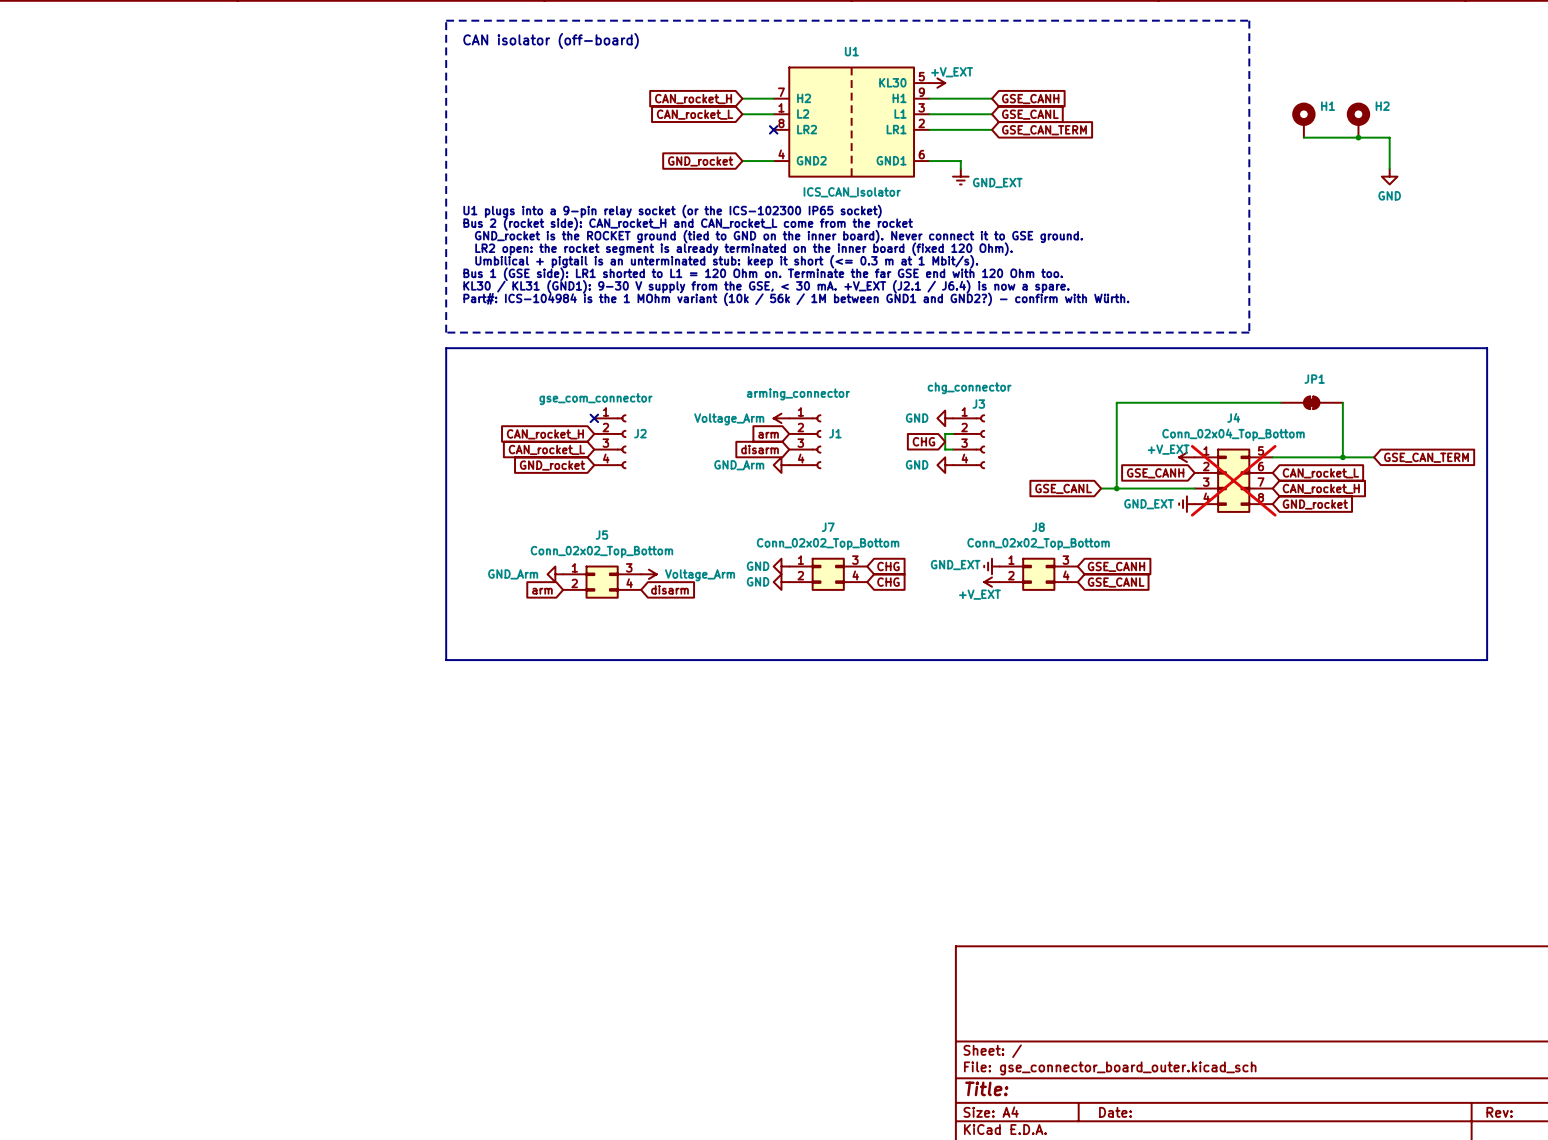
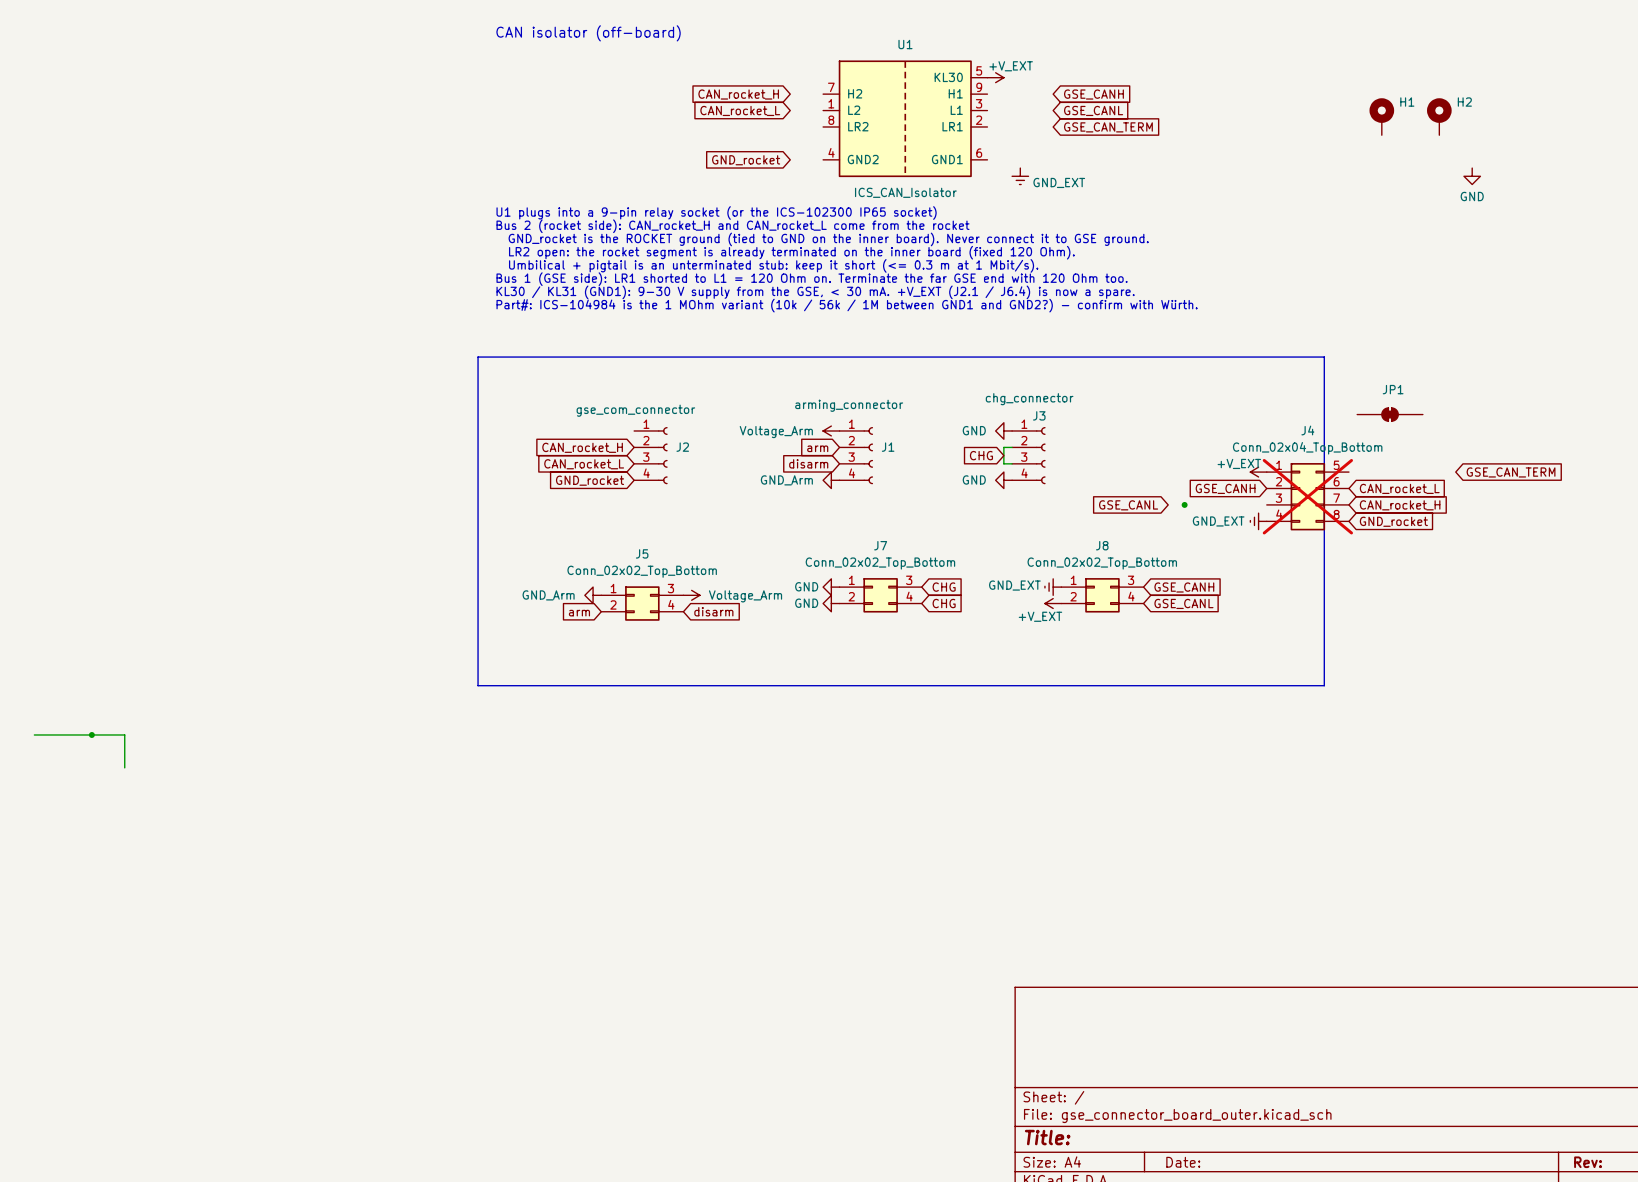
line: (446, 20) (1249, 20) (1249, 332) (446, 332) (446, 20) -> none
wire: (742, 98) (773, 98) -> none
wire: (929, 98) (991, 98) -> none
wire: (742, 114) (773, 114) -> none
wire: (929, 114) (991, 114) -> none
no-connect mark: (773, 129) -> none
wire: (929, 129) (991, 129) -> none
wire: (1303, 137) (1389, 137) (1389, 168) -> none
junction: (1358, 137) -> none
wire: (742, 161) (773, 161) -> none
wire: (929, 161) (960, 161) (960, 168) -> none
line: (1249, 348) (1487, 348) (1487, 660) (1249, 660) -> (1324, 357) (1324, 685)
wire: (1280, 402) (1116, 402) (1116, 488) -> none
wire: (1342, 402) (1342, 457) -> none
no-connect mark: (594, 418) -> none
wire: (1272, 457) (1374, 457) -> none
junction: (1342, 457) -> none
wire: (1101, 488) (1194, 488) -> none
wire: none -> (34, 734) (124, 734) (124, 767)
junction: none -> (91, 734)

